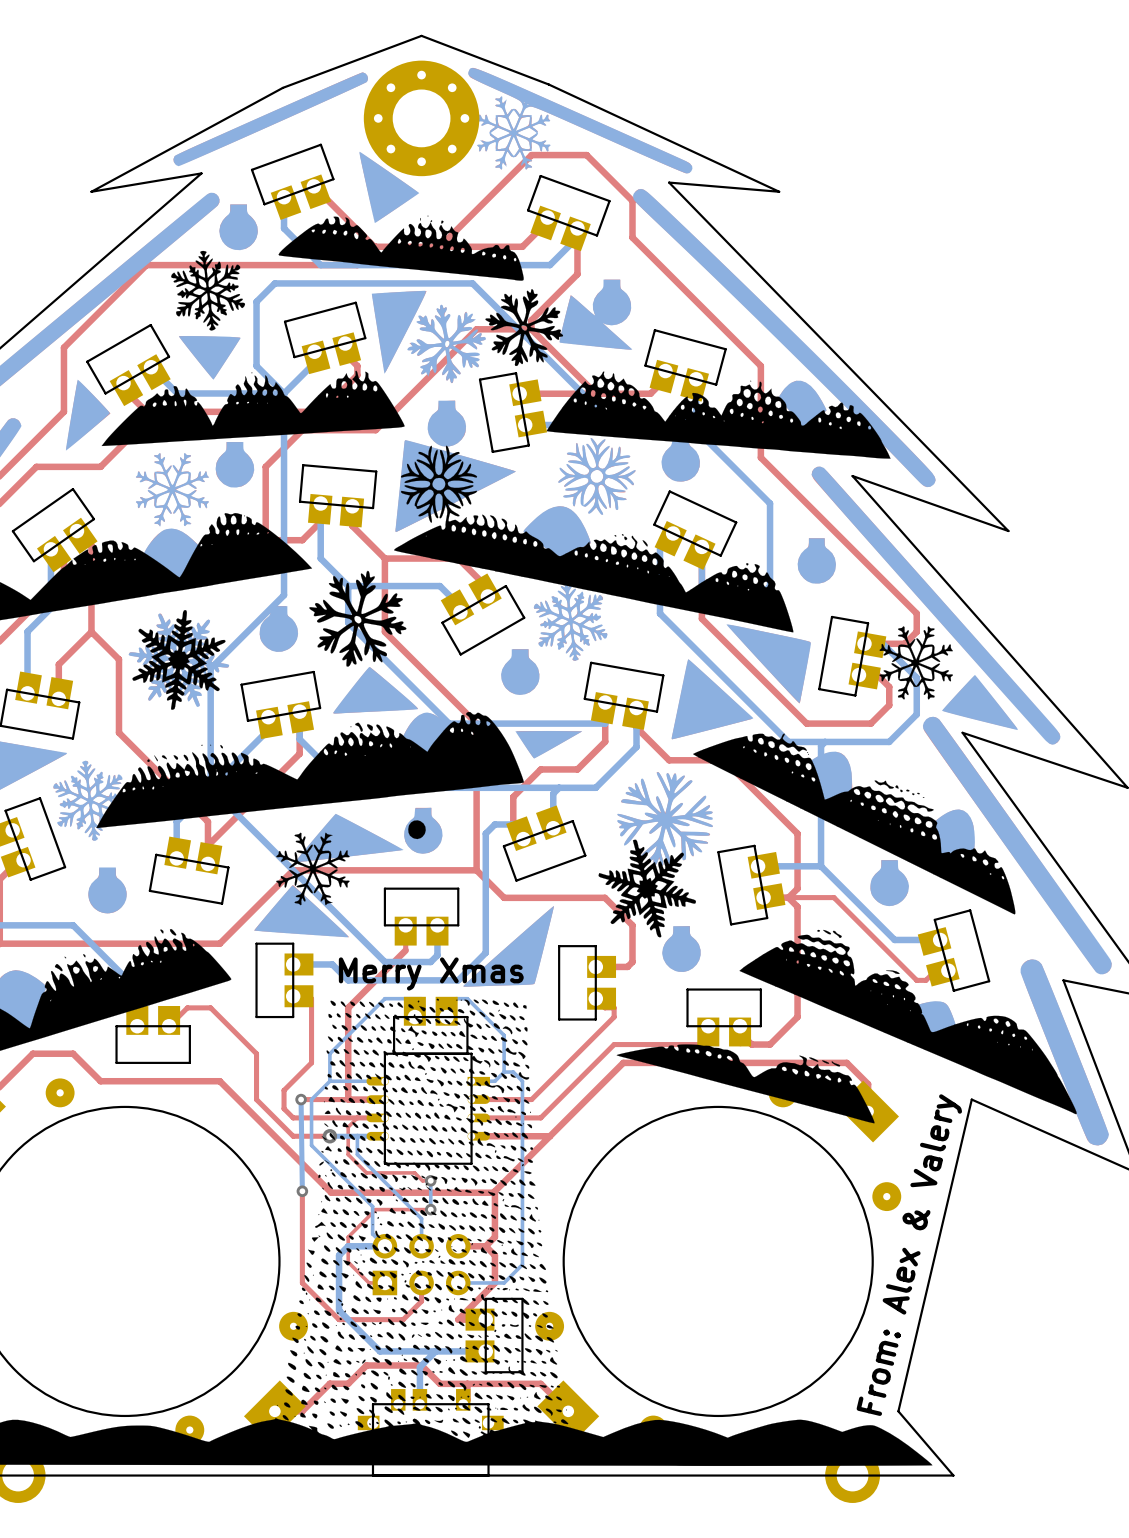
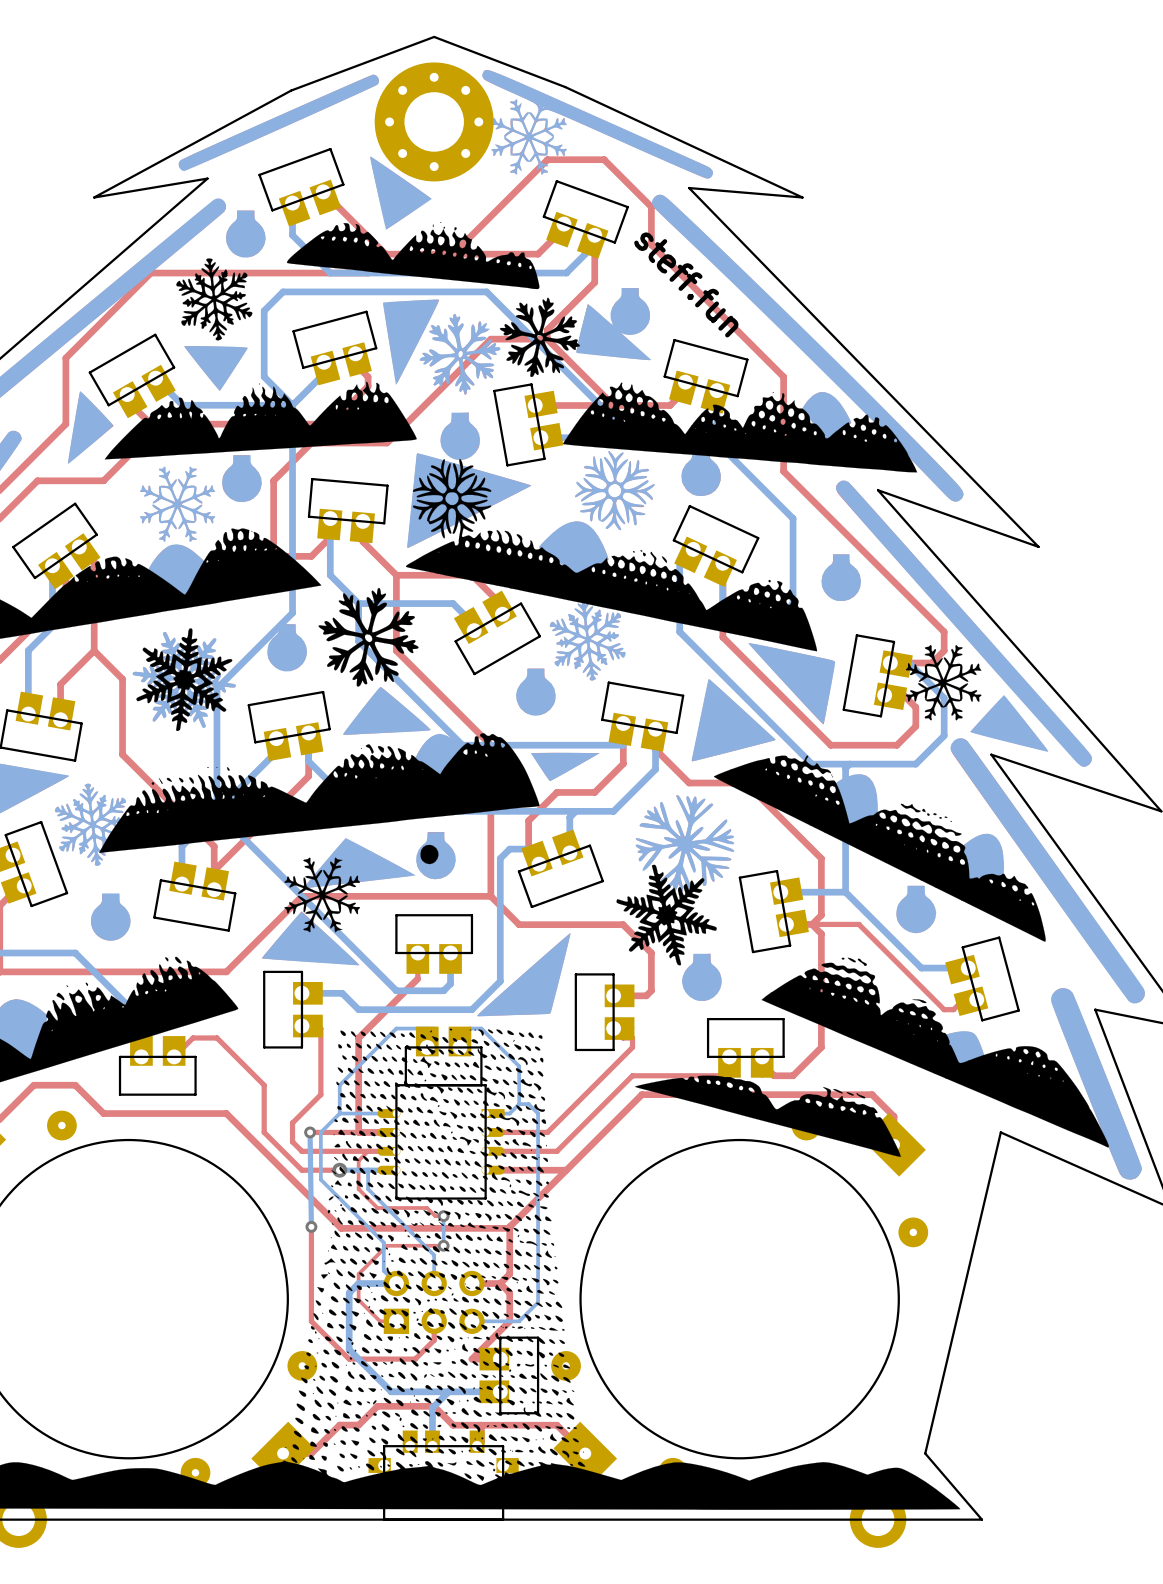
text: none -> steff.fun (686, 284)
text: Merry Xmas (431, 973) -> none
text: From: Alex & Valery (909, 1255) -> none

